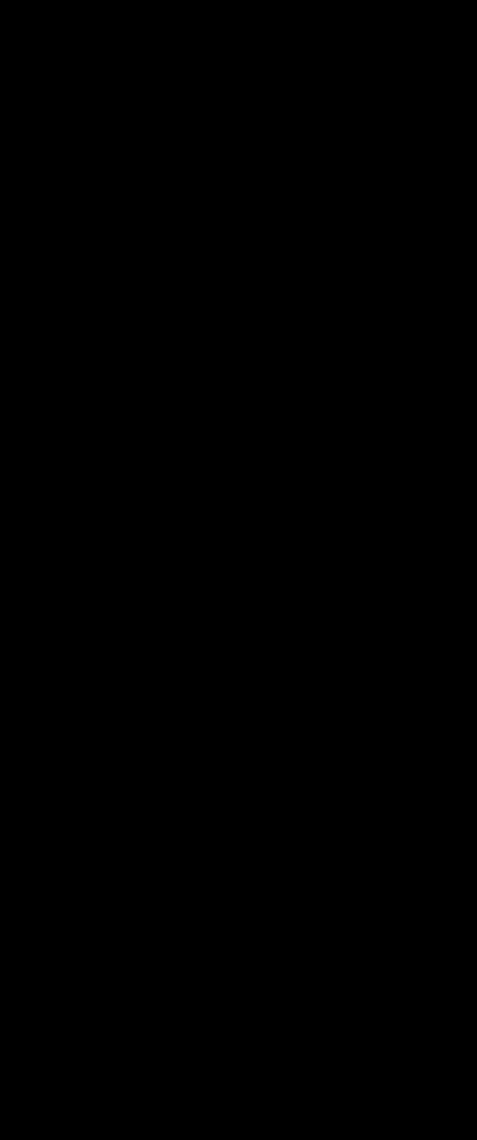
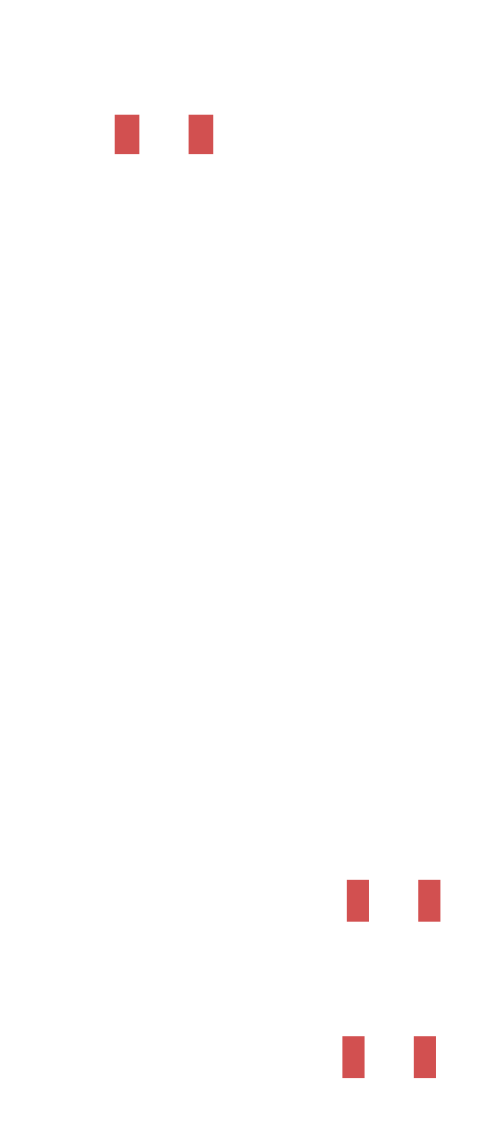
part: none -> (163, 134)
part: none -> (393, 900)
part: none -> (389, 1057)

